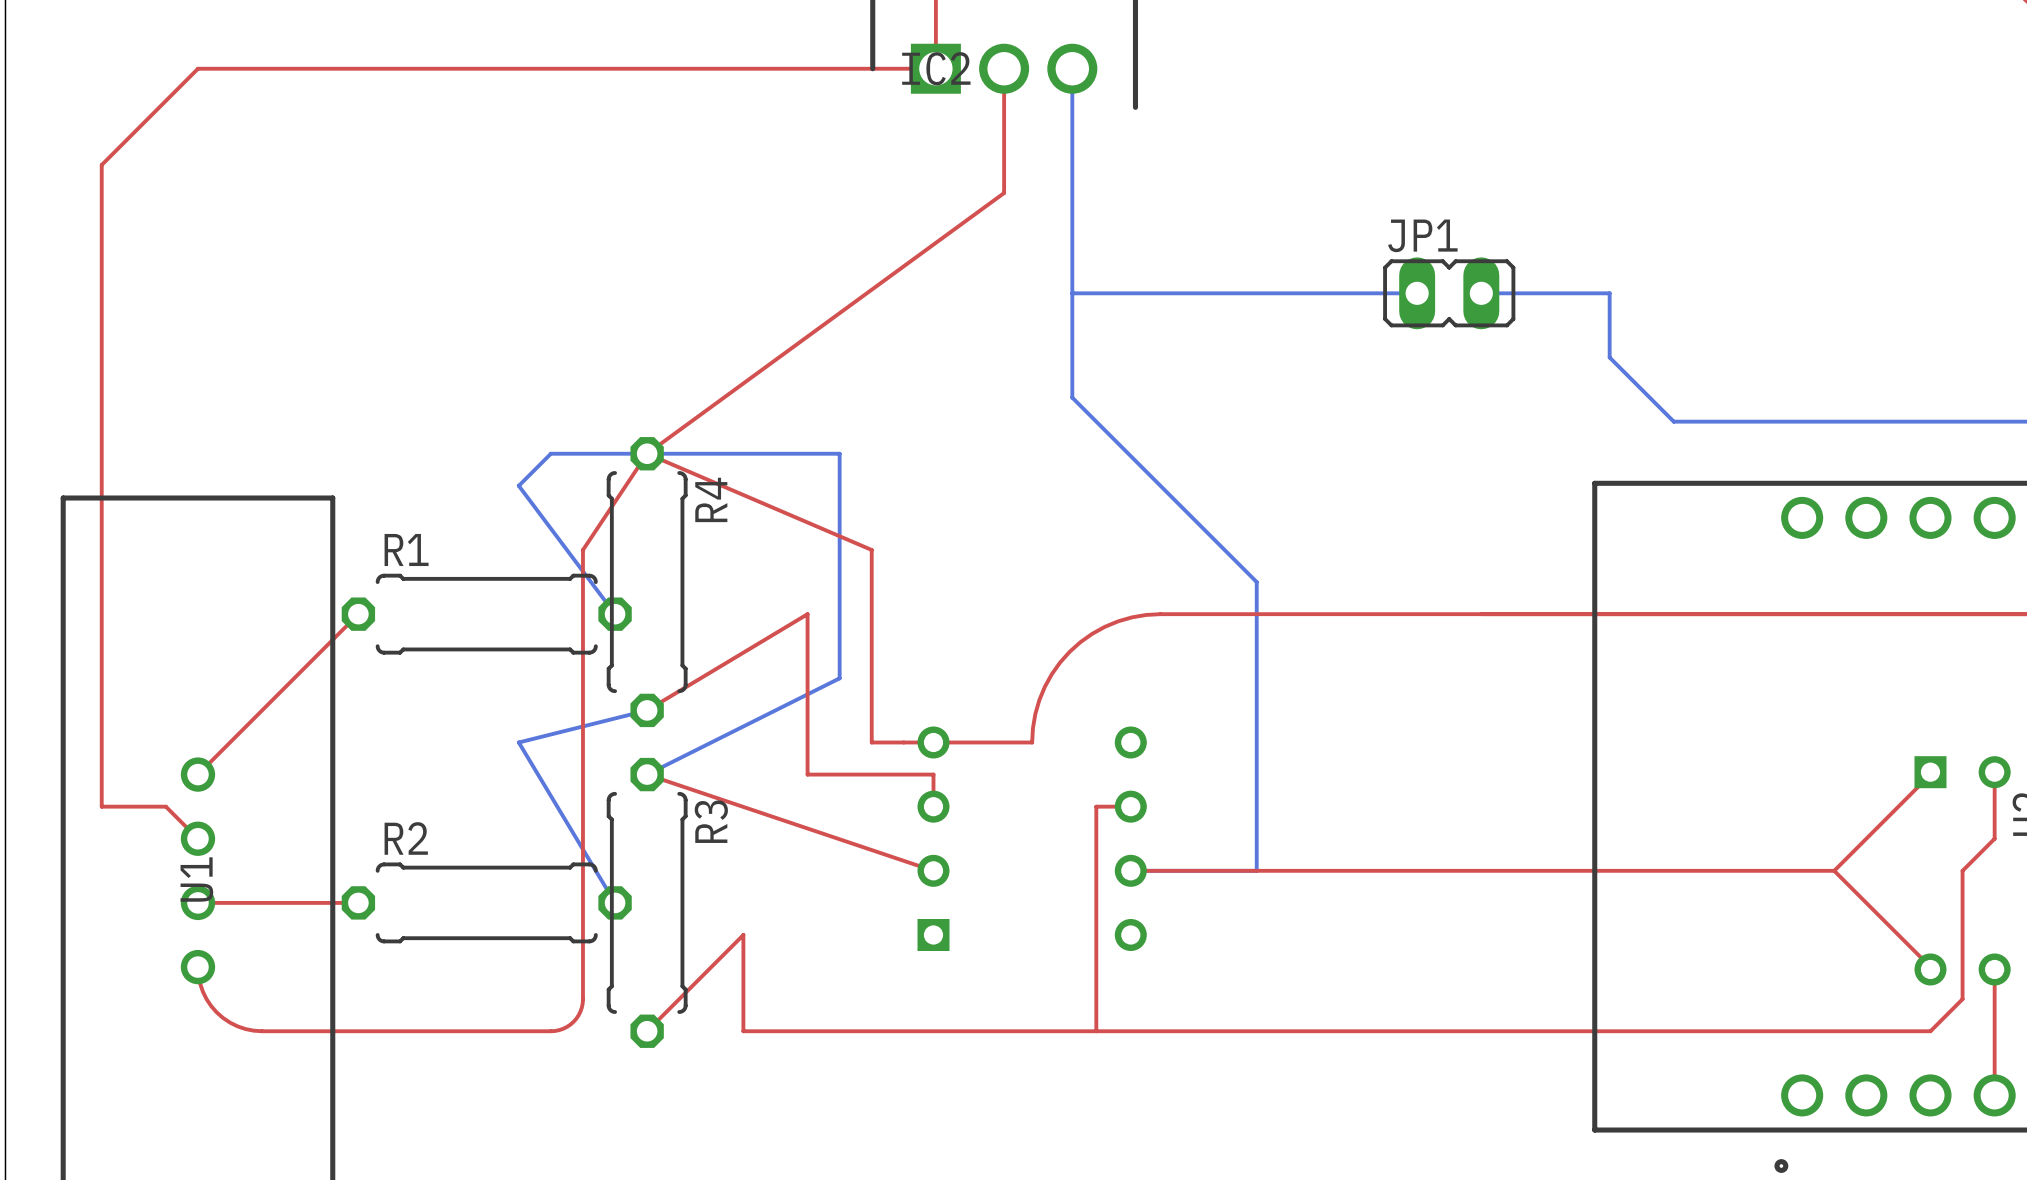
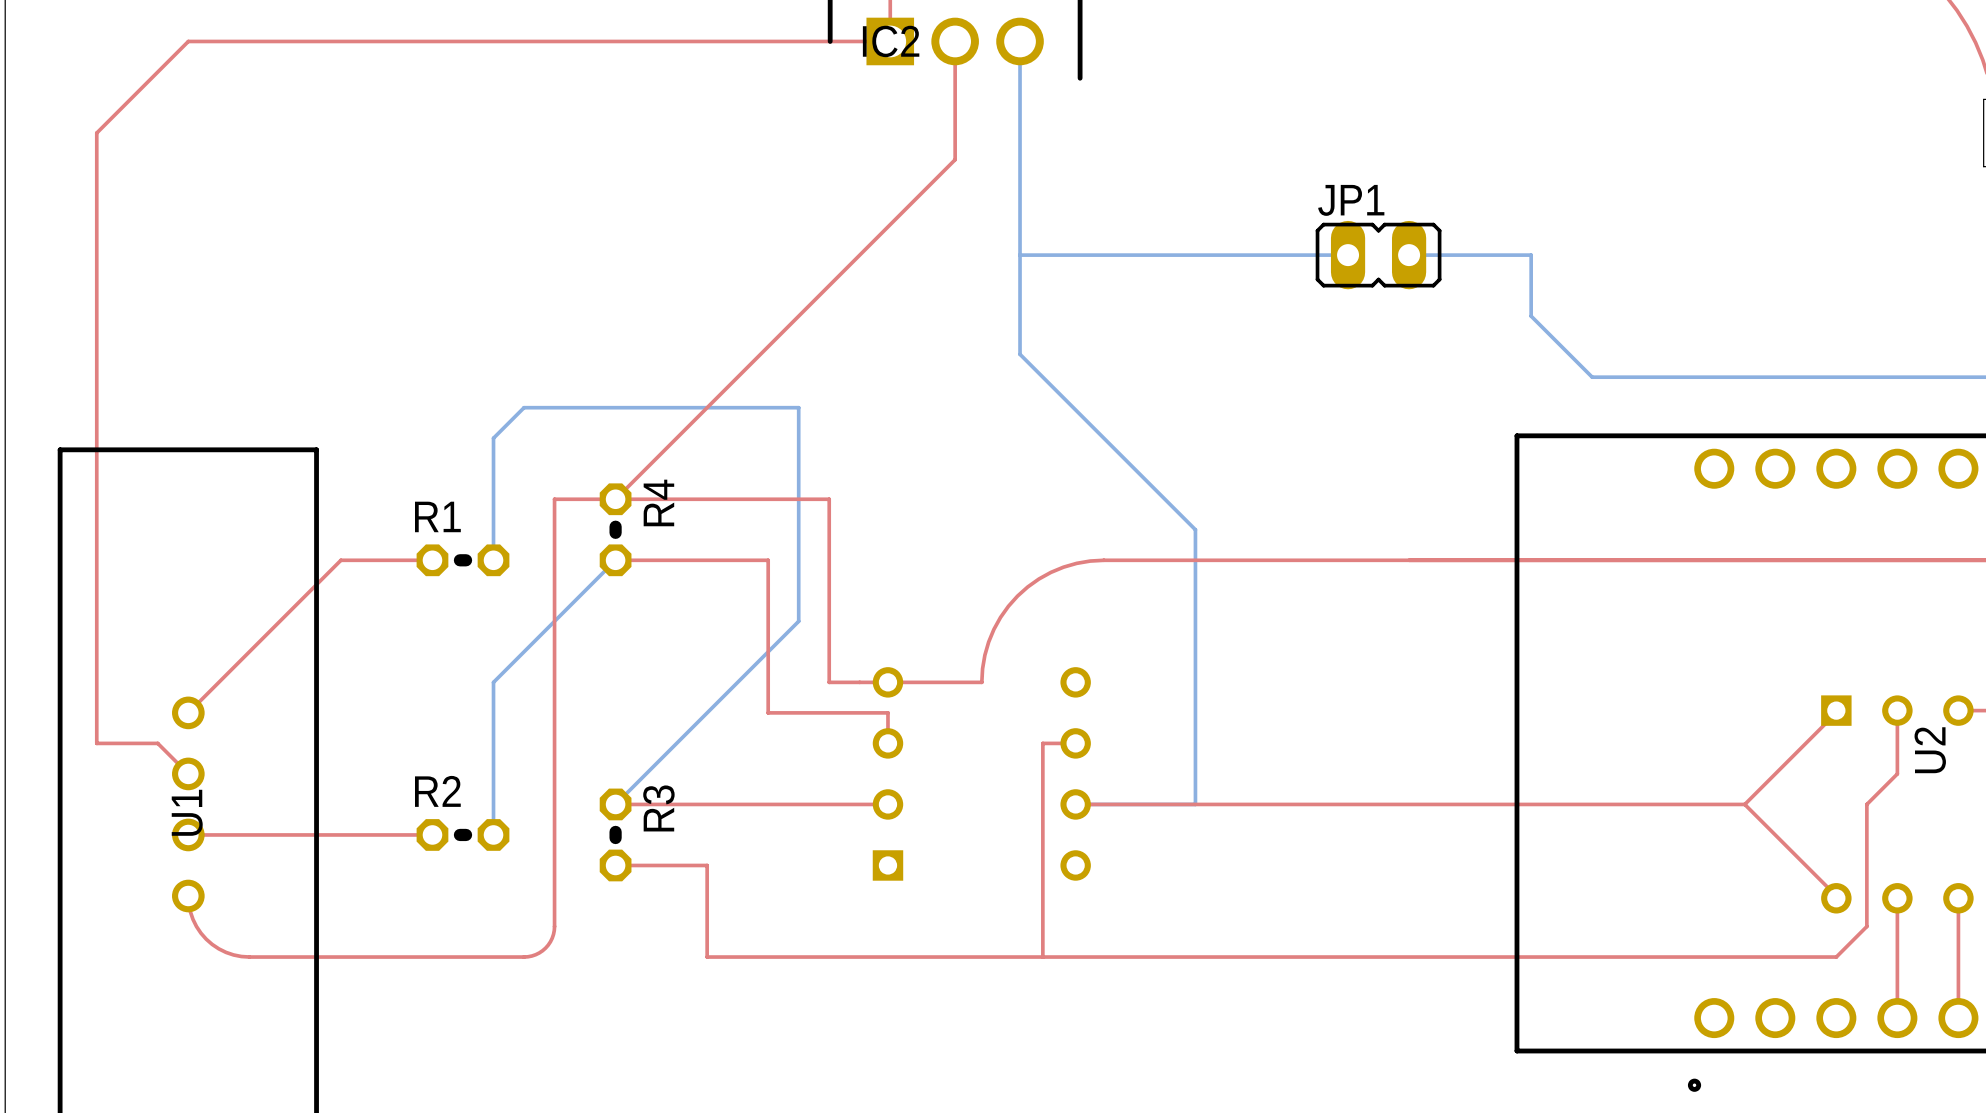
top track: (1004, 193) (647, 453) -> (955, 159) (615, 499)
R4 footprint: [606, 437, 688, 728] -> [599, 483, 632, 577]
top track: (647, 453) (871, 549) -> (554, 499) (829, 499)
top track: (647, 453) (582, 549) -> none
bottom track: (518, 485) (615, 614) -> (493, 438) (493, 560)
R4 name position: R4 (711, 499) -> R4 (658, 502)
R1 name position: R1 (406, 549) -> R1 (437, 516)
R1 footprint: [341, 573, 632, 655] -> [416, 544, 510, 577]
top track: none -> (340, 560) (432, 560)
bottom track: none -> (615, 560) (493, 682) (493, 834)
top track: (807, 614) (647, 710) -> (768, 560) (615, 560)
bottom track: (839, 678) (647, 774) -> (798, 621) (615, 804)
bottom track: (647, 710) (518, 742) (615, 902) -> none
R3 footprint: [606, 757, 688, 1048] -> [599, 788, 632, 882]
top track: (647, 774) (933, 870) -> (615, 804) (887, 804)
R3 name position: R3 (711, 821) -> R3 (658, 808)
R2 name position: R2 (406, 838) -> R2 (437, 791)
R2 footprint: [341, 862, 632, 944] -> [416, 819, 510, 851]
top track: none -> (340, 834) (432, 834)
top track: (743, 934) (647, 1031) -> (707, 865) (615, 865)

